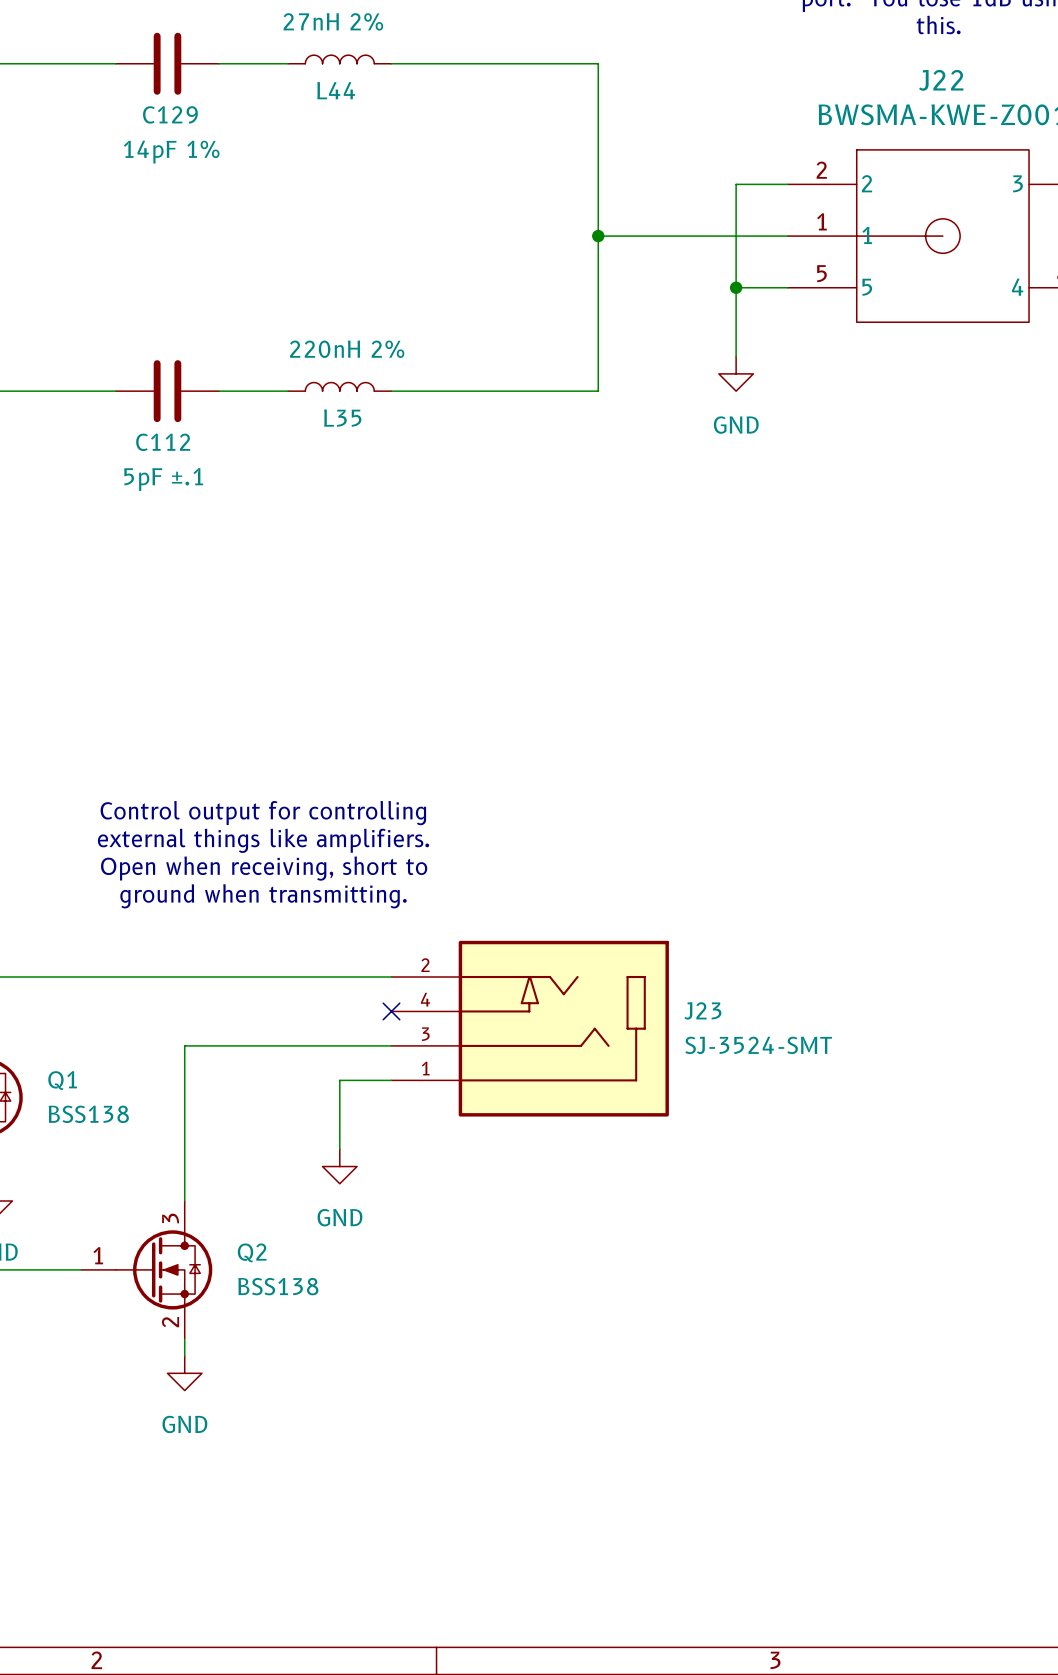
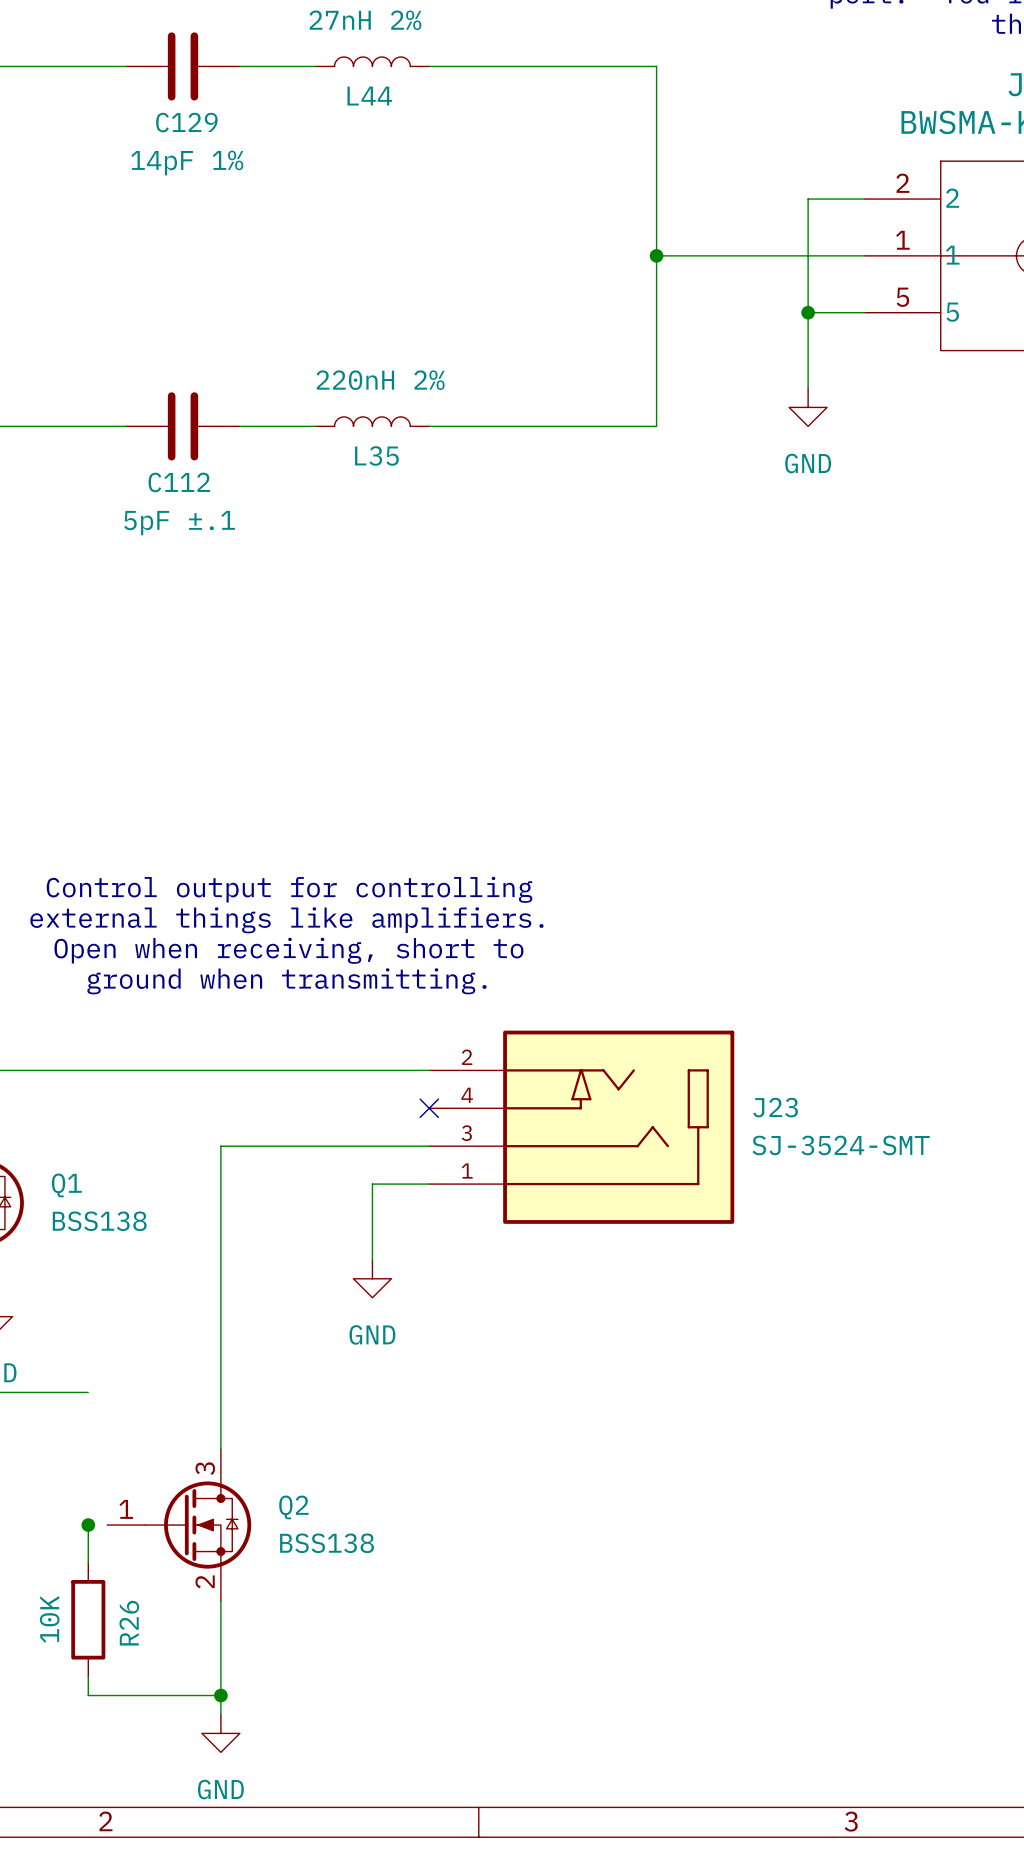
wire: (201, 1045) (184, 1045) (184, 1201) -> (220, 1146) (220, 1449)
Q2 position: (146, 1269) -> (179, 1525)
wire: (184, 1338) (184, 1356) -> none
power symbol position: GND (184, 1373) -> GND (220, 1733)
wire: none -> (88, 1525) (88, 1562)
junction: none -> (88, 1525)
wire: none -> (220, 1600) (220, 1714)
R26: none -> 10K (88, 1619)
wire: none -> (88, 1676) (88, 1695) (220, 1695)
junction: none -> (220, 1695)

